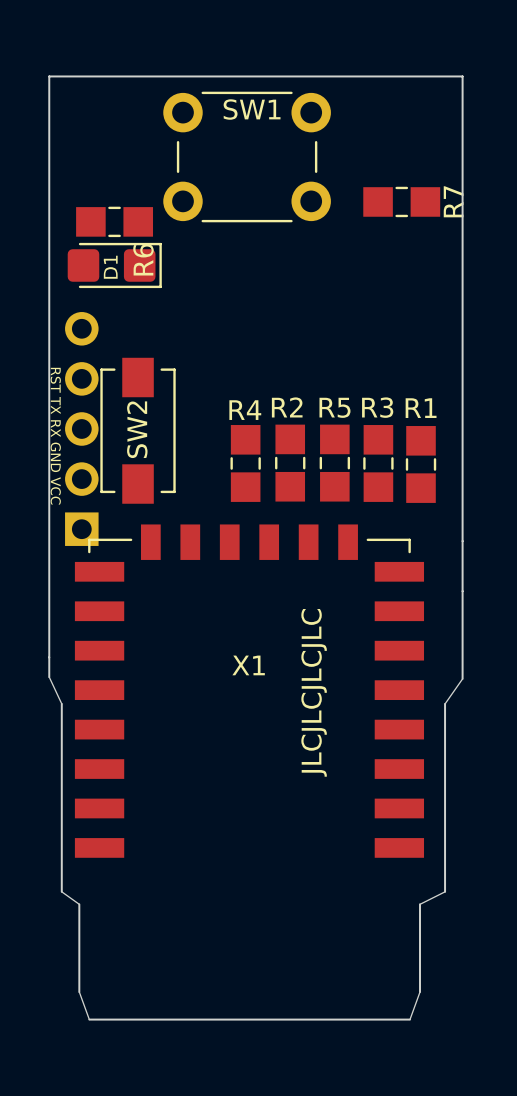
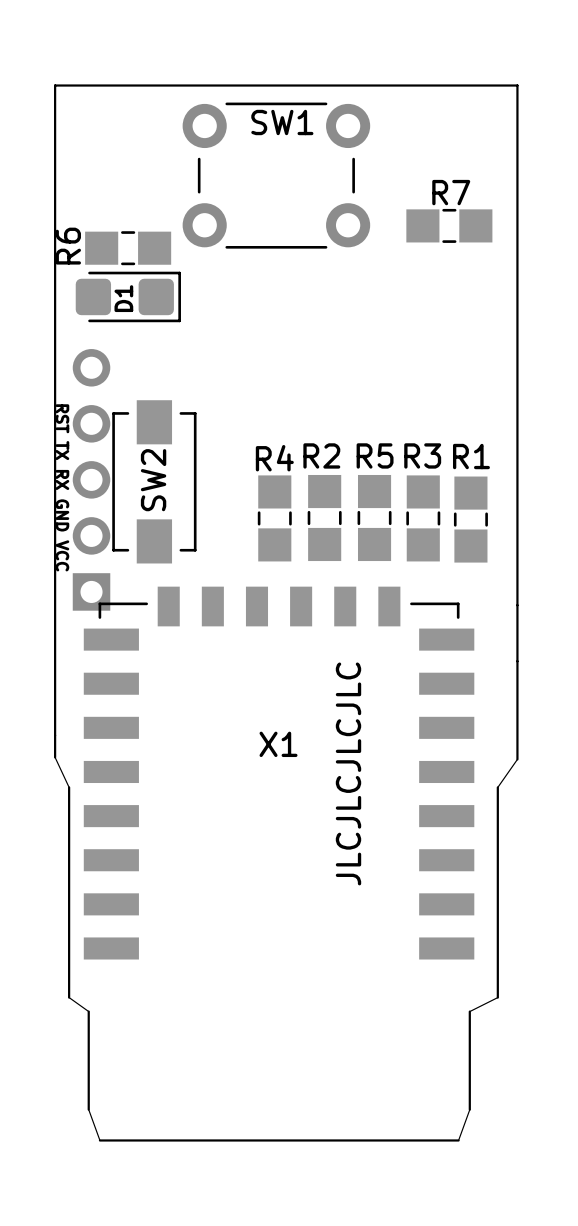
R7 name rotation: 0° (453, 201) -> 90° clockwise (451, 192)
R7 name position: R7 (453, 201) -> R7 (451, 192)
R6 name position: R6 (143, 259) -> R6 (68, 246)

